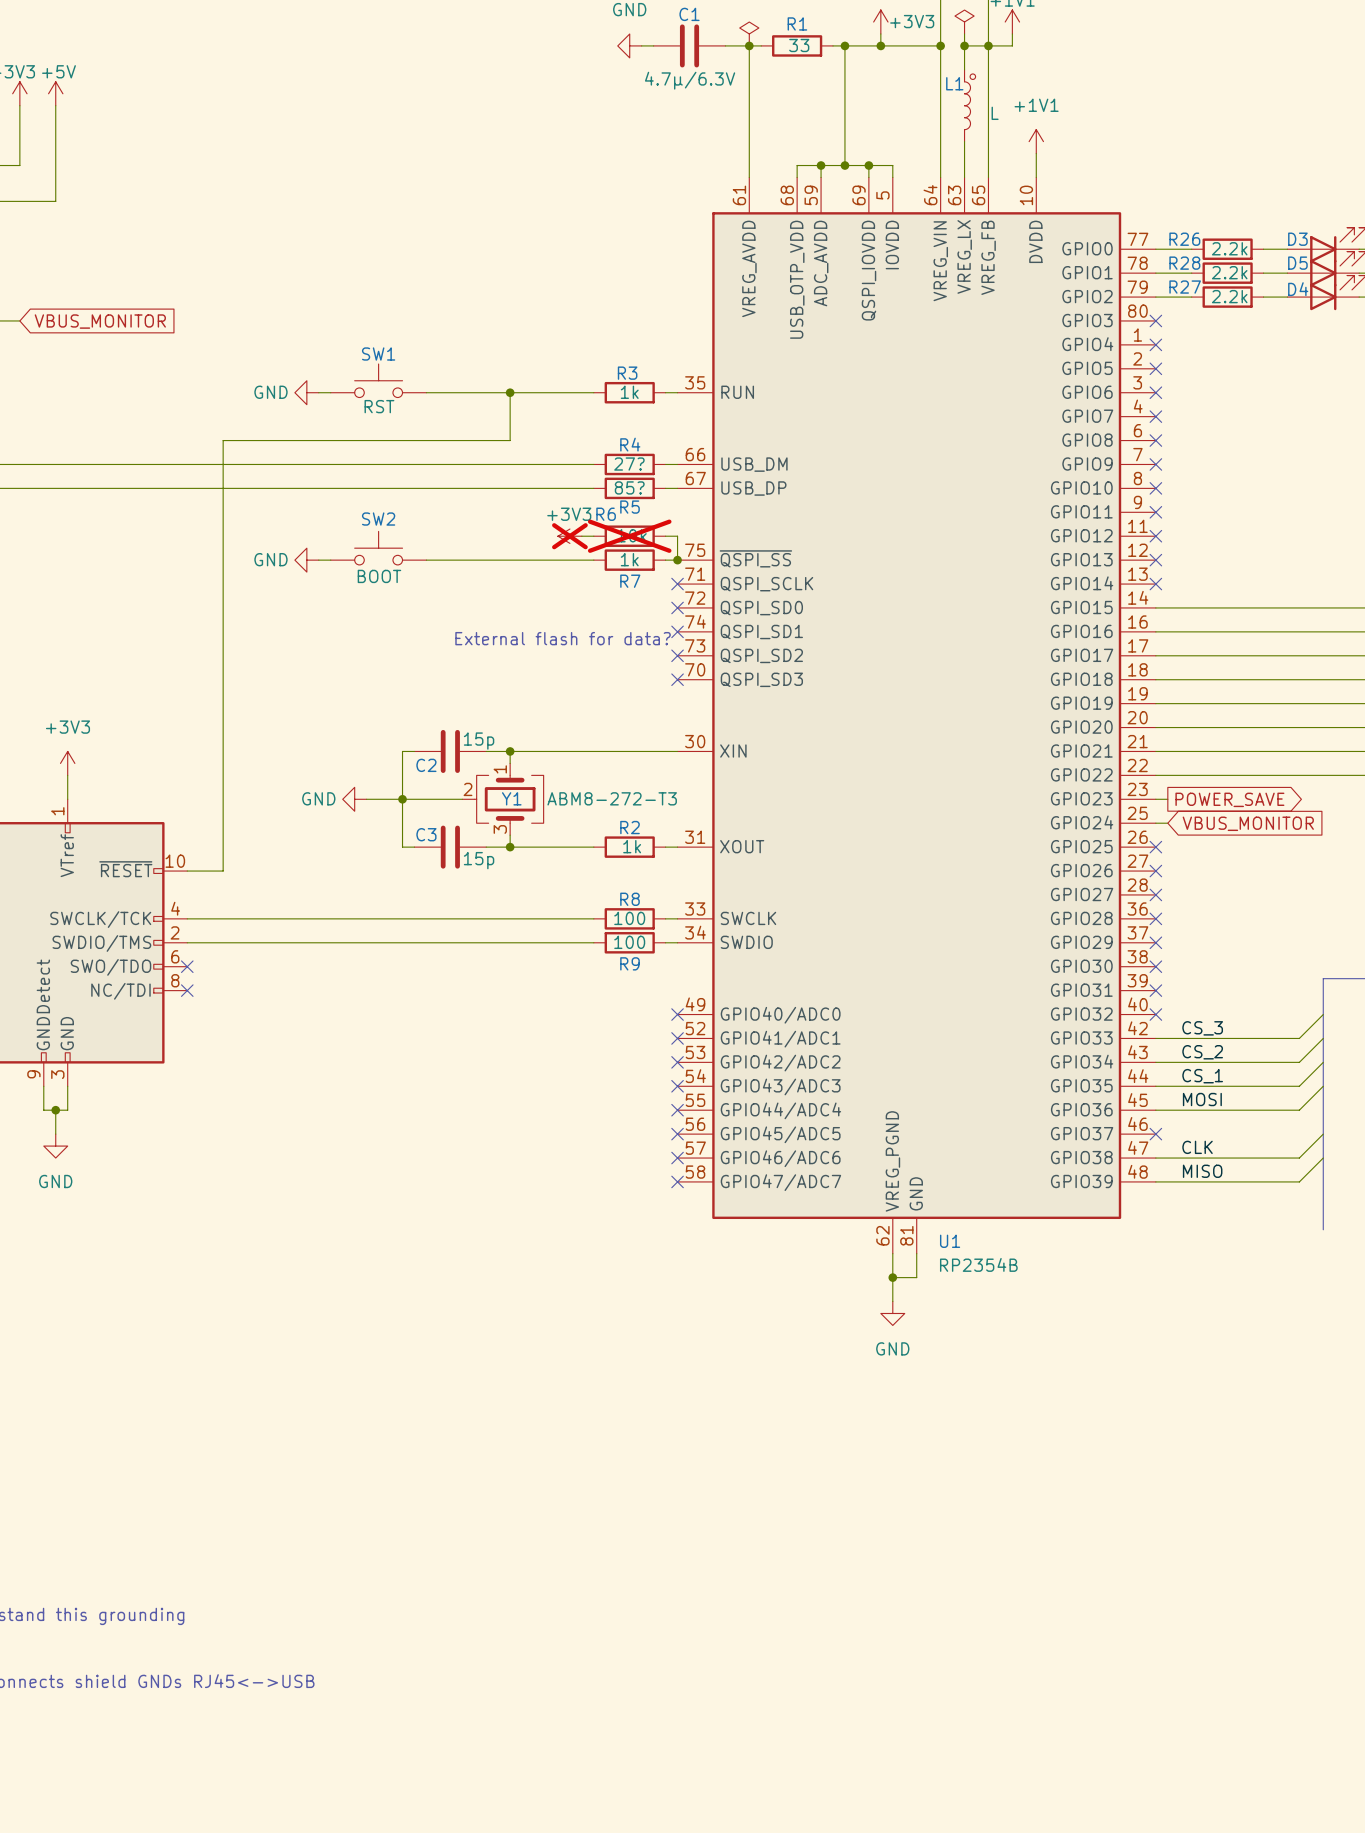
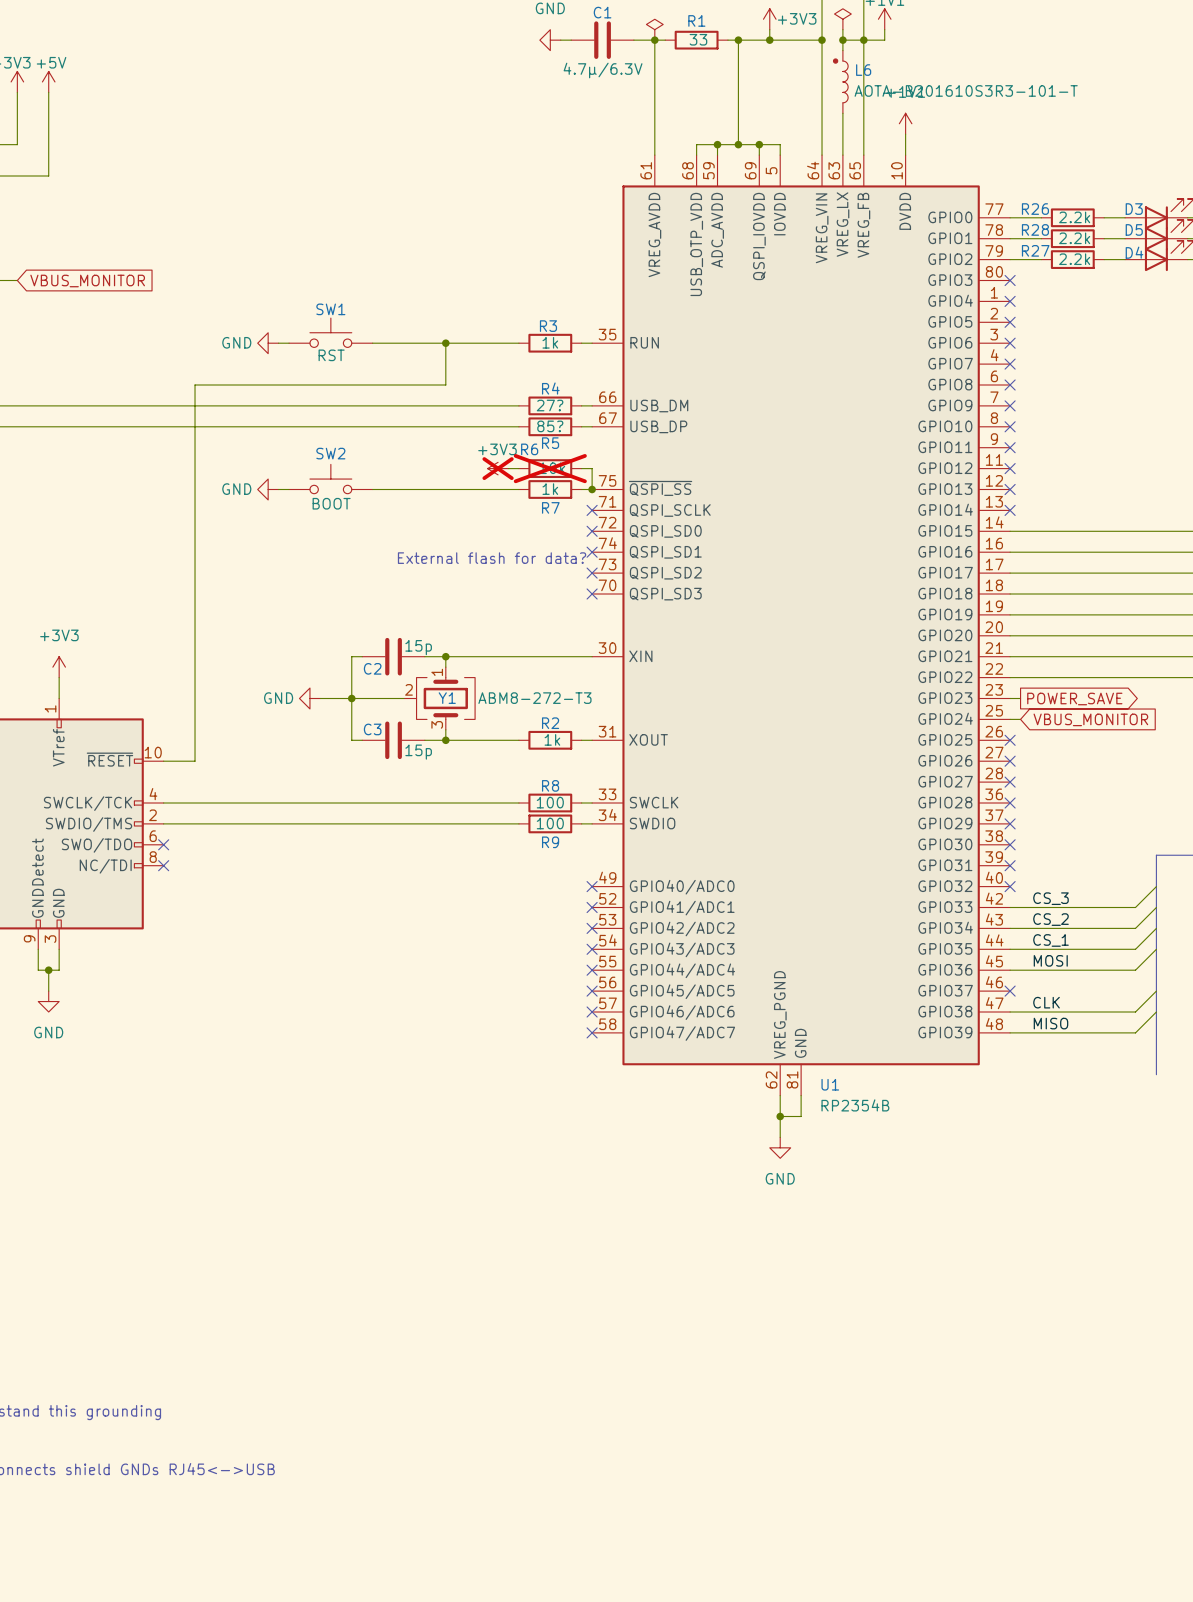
L6: none -> AOTA-B201610S3R3-101-T (840, 81)
L1: L (970, 105) -> none

